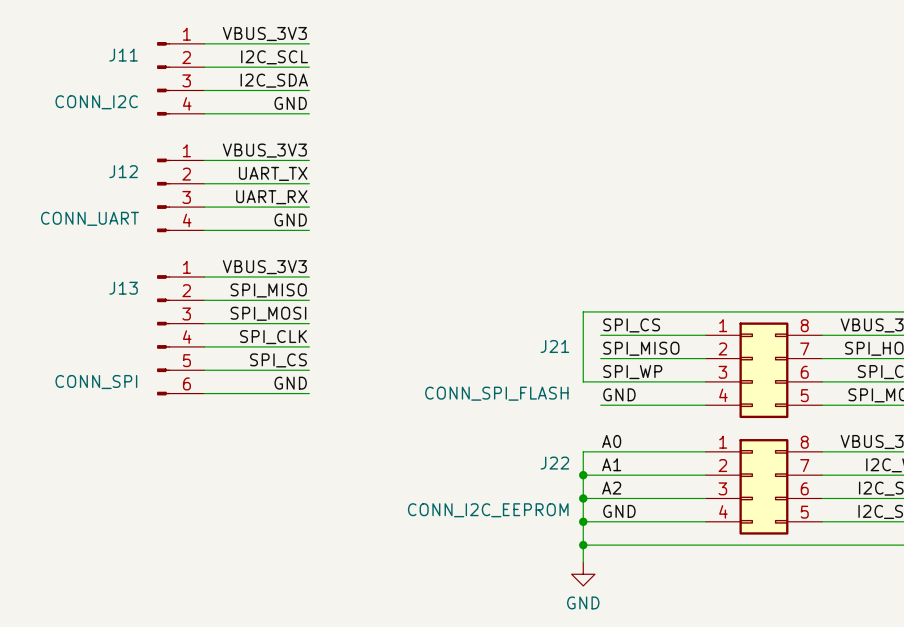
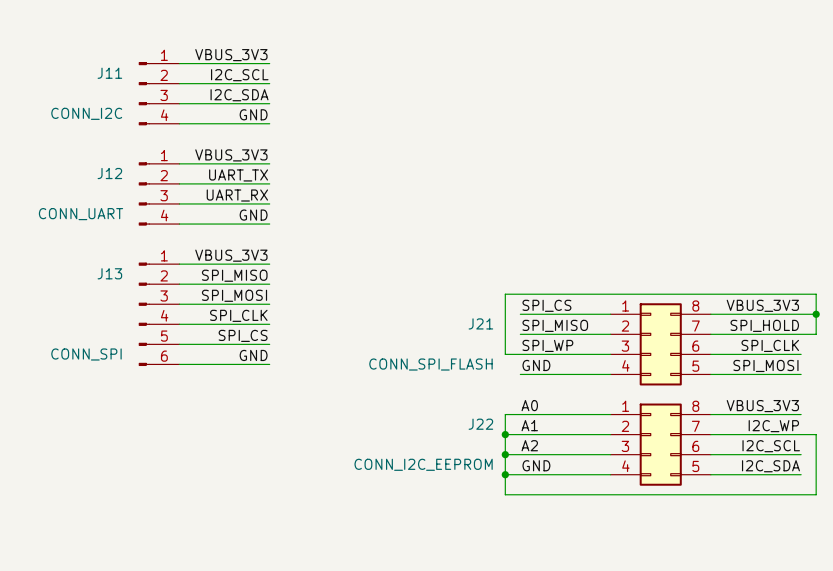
wire: (583, 545) (583, 562) -> none
junction: (583, 545) -> none
power symbol: GND (583, 574) -> none

